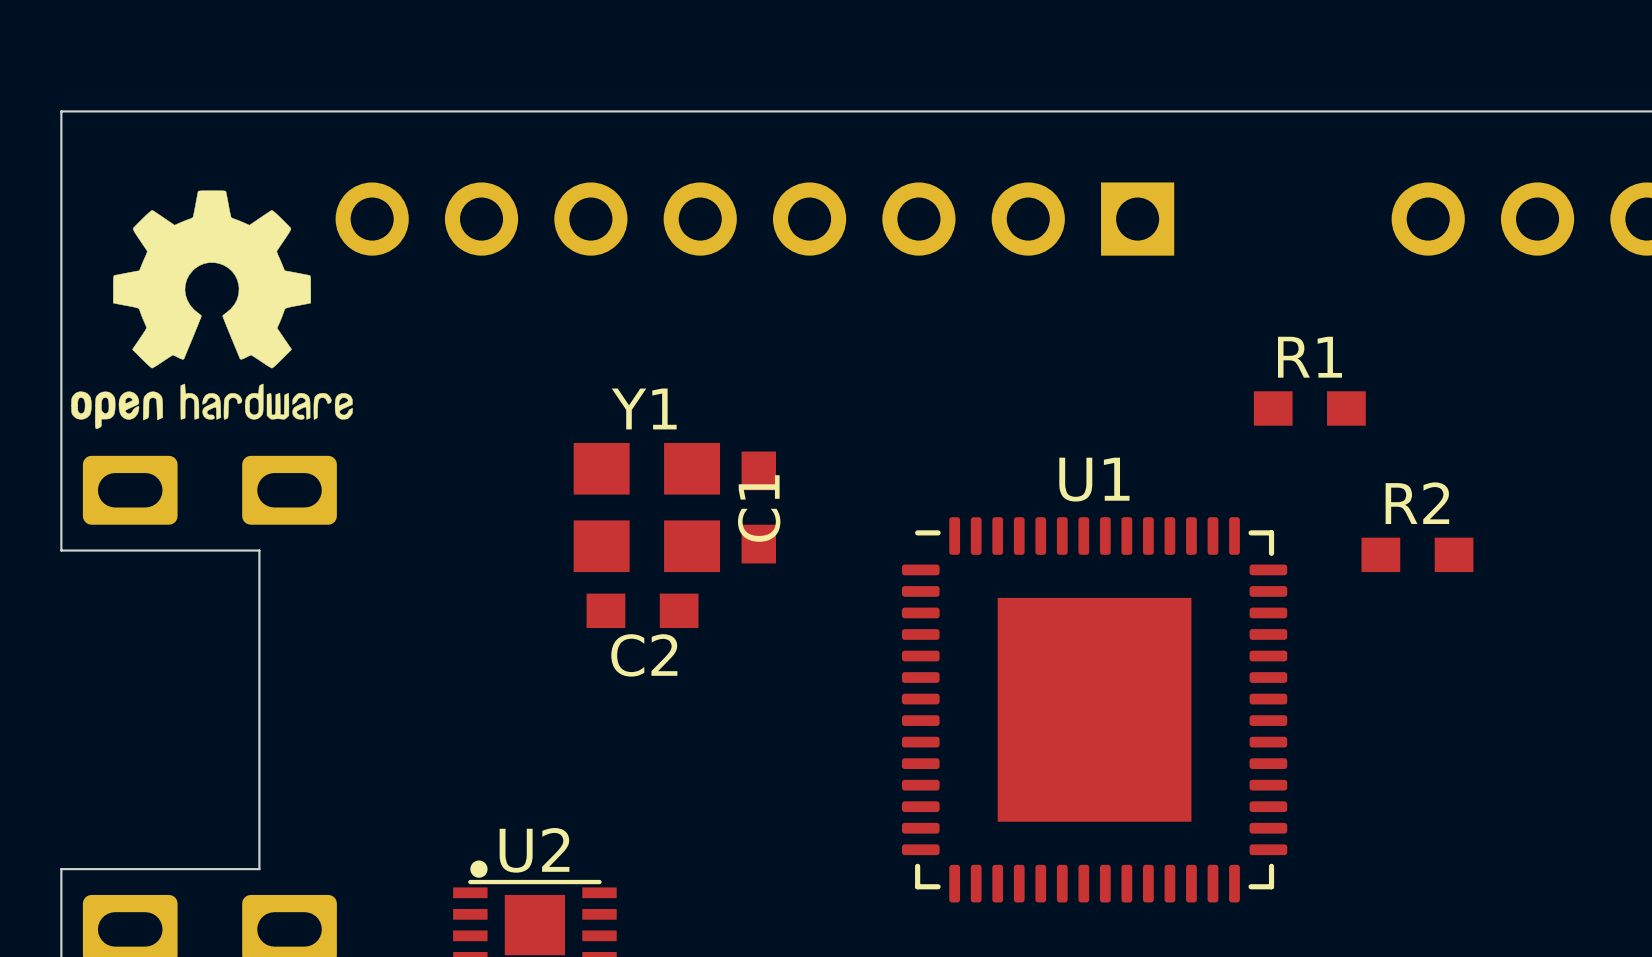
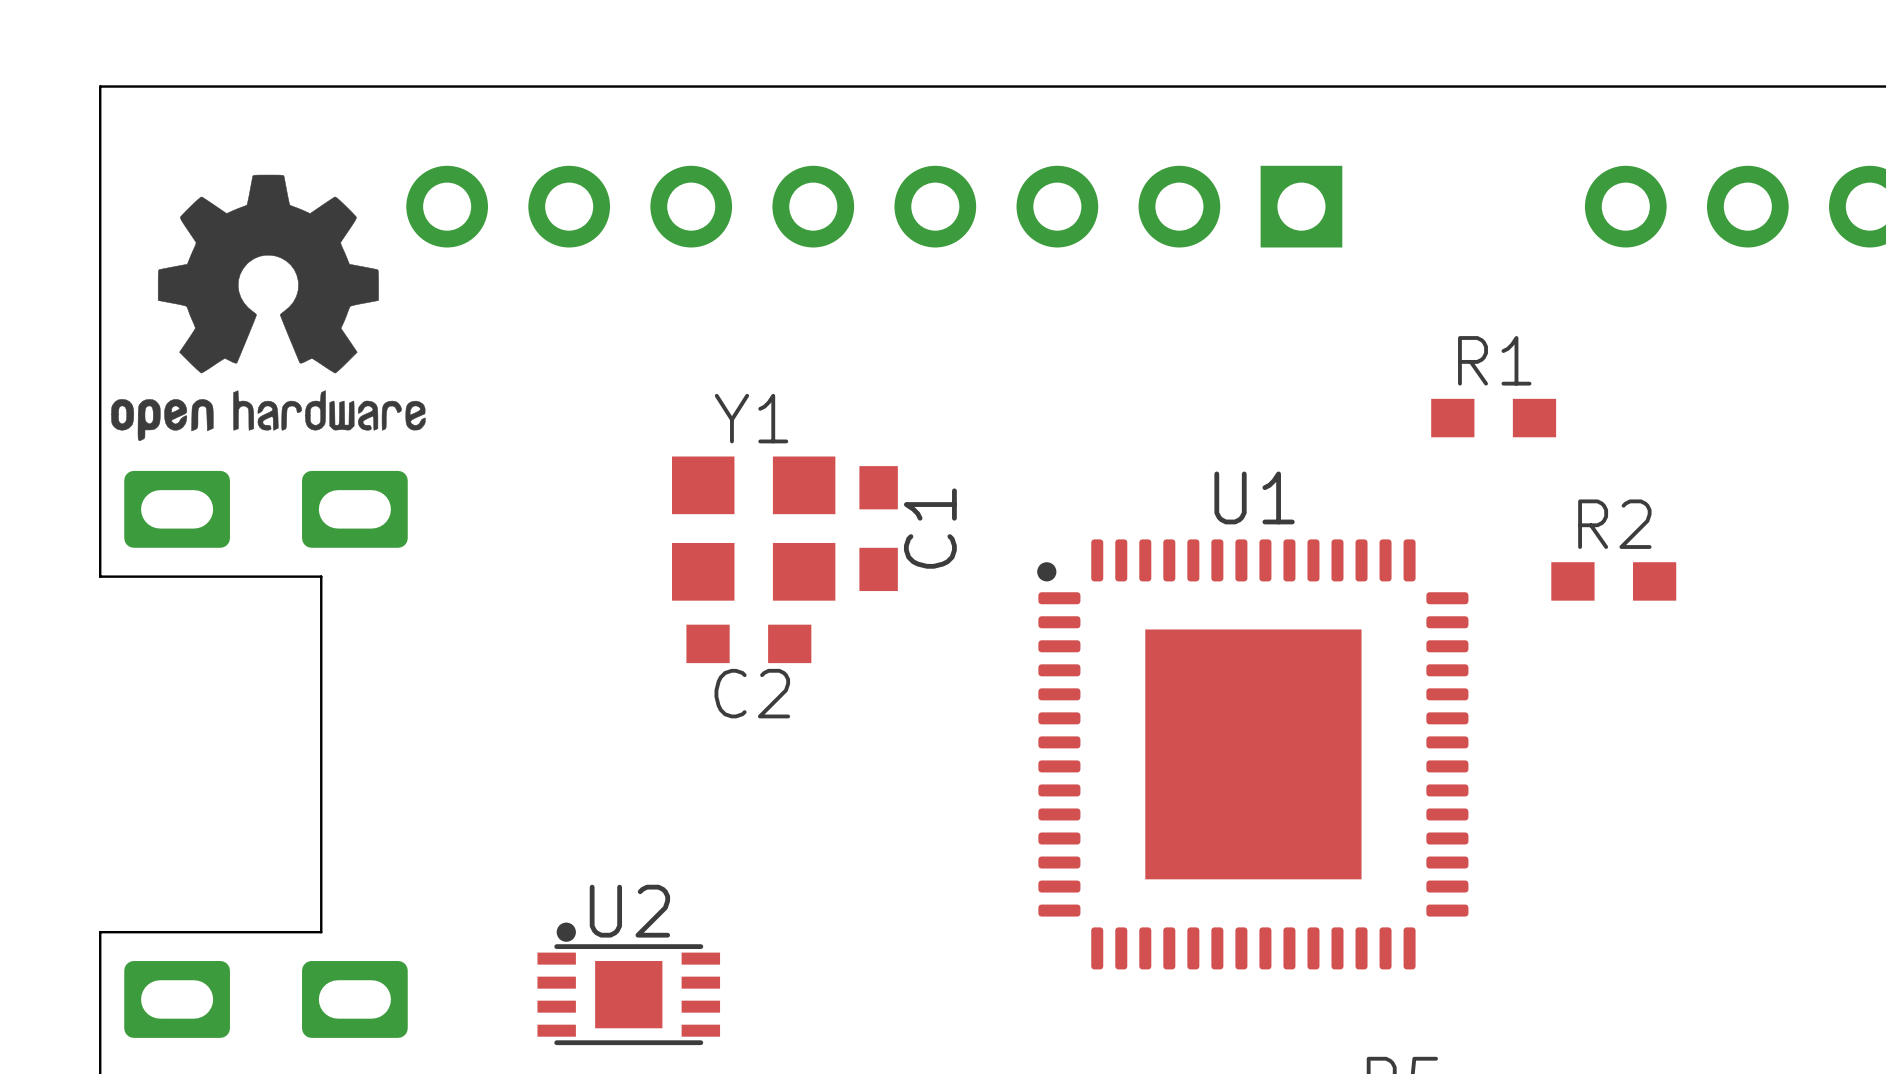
C1 name position: C1 (759, 508) -> C1 (930, 528)
U1 footprint: [901, 517, 1288, 903] -> [1037, 539, 1469, 970]

